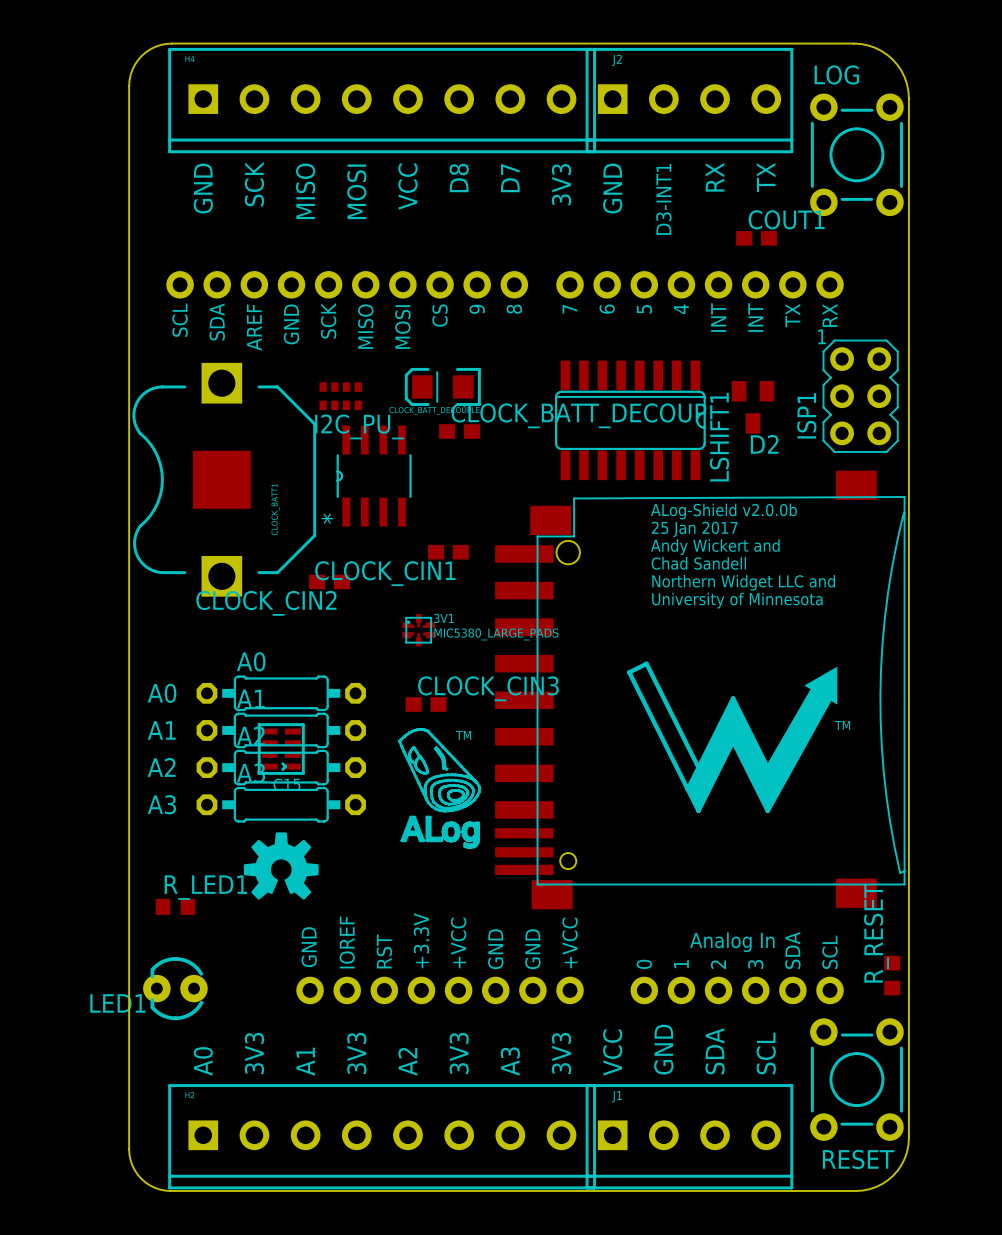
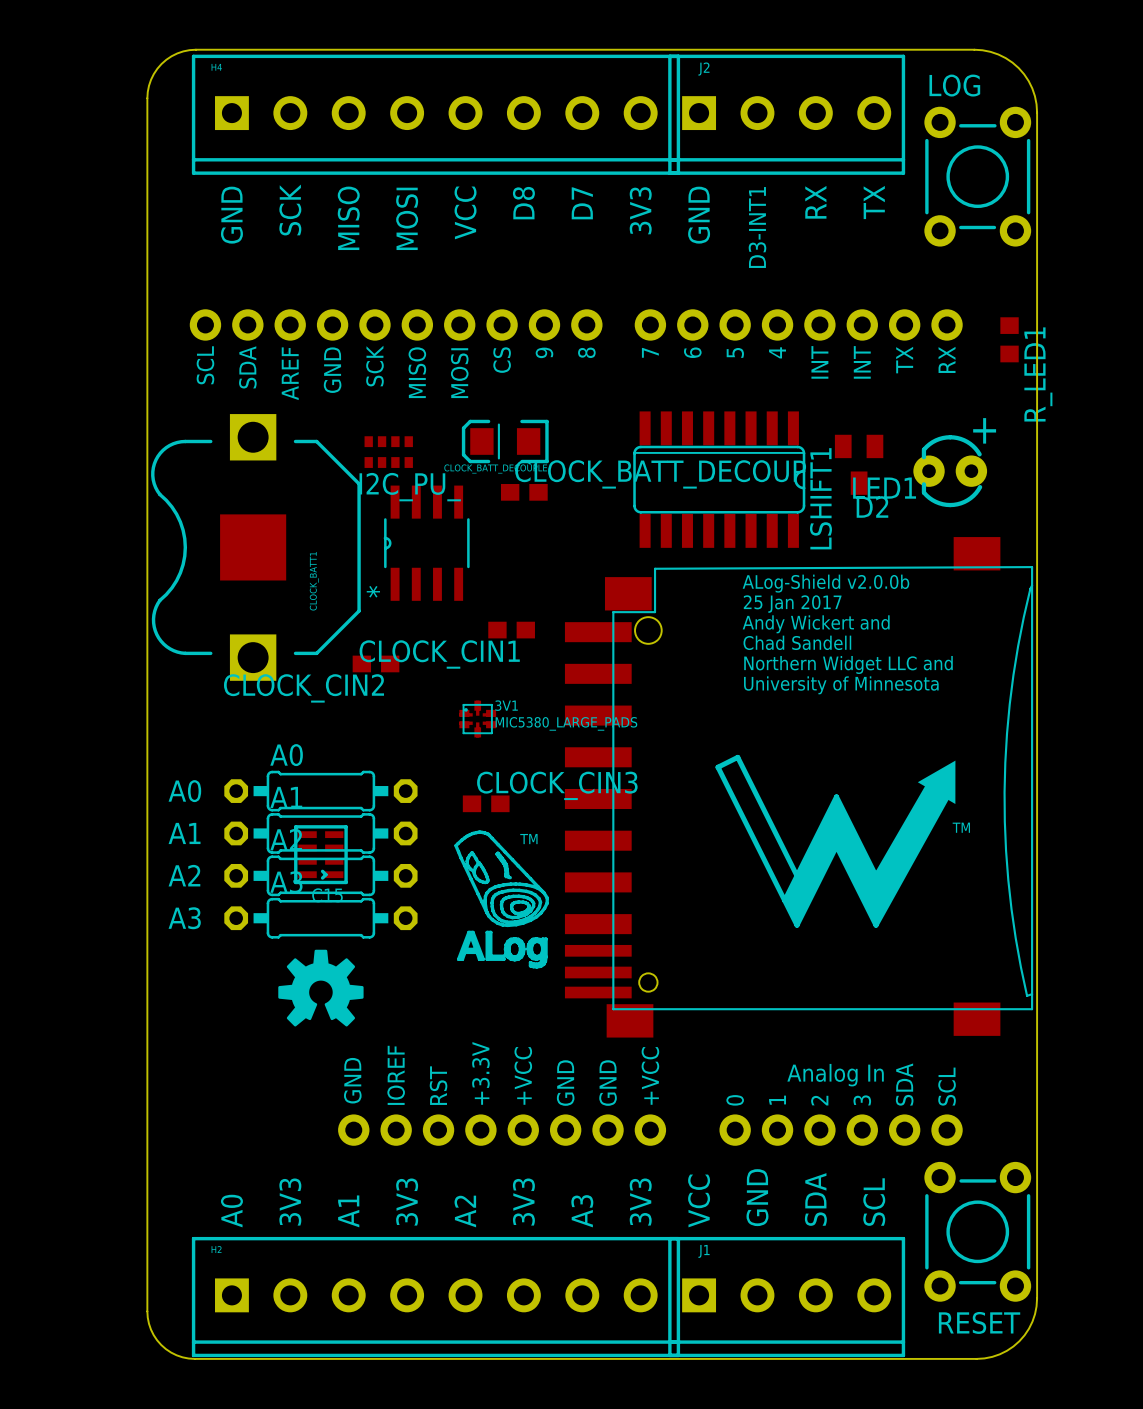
COUT1: (756, 238) -> none
text: none -> + (984, 430)
ISP1: (860, 396) -> none
R_LED1 rotation: 0° (175, 906) -> 90° clockwise (1009, 339)
R_LED1 position: (175, 906) -> (1009, 339)
R_RESET: (892, 975) -> none
LED1 position: (175, 988) -> (950, 471)

